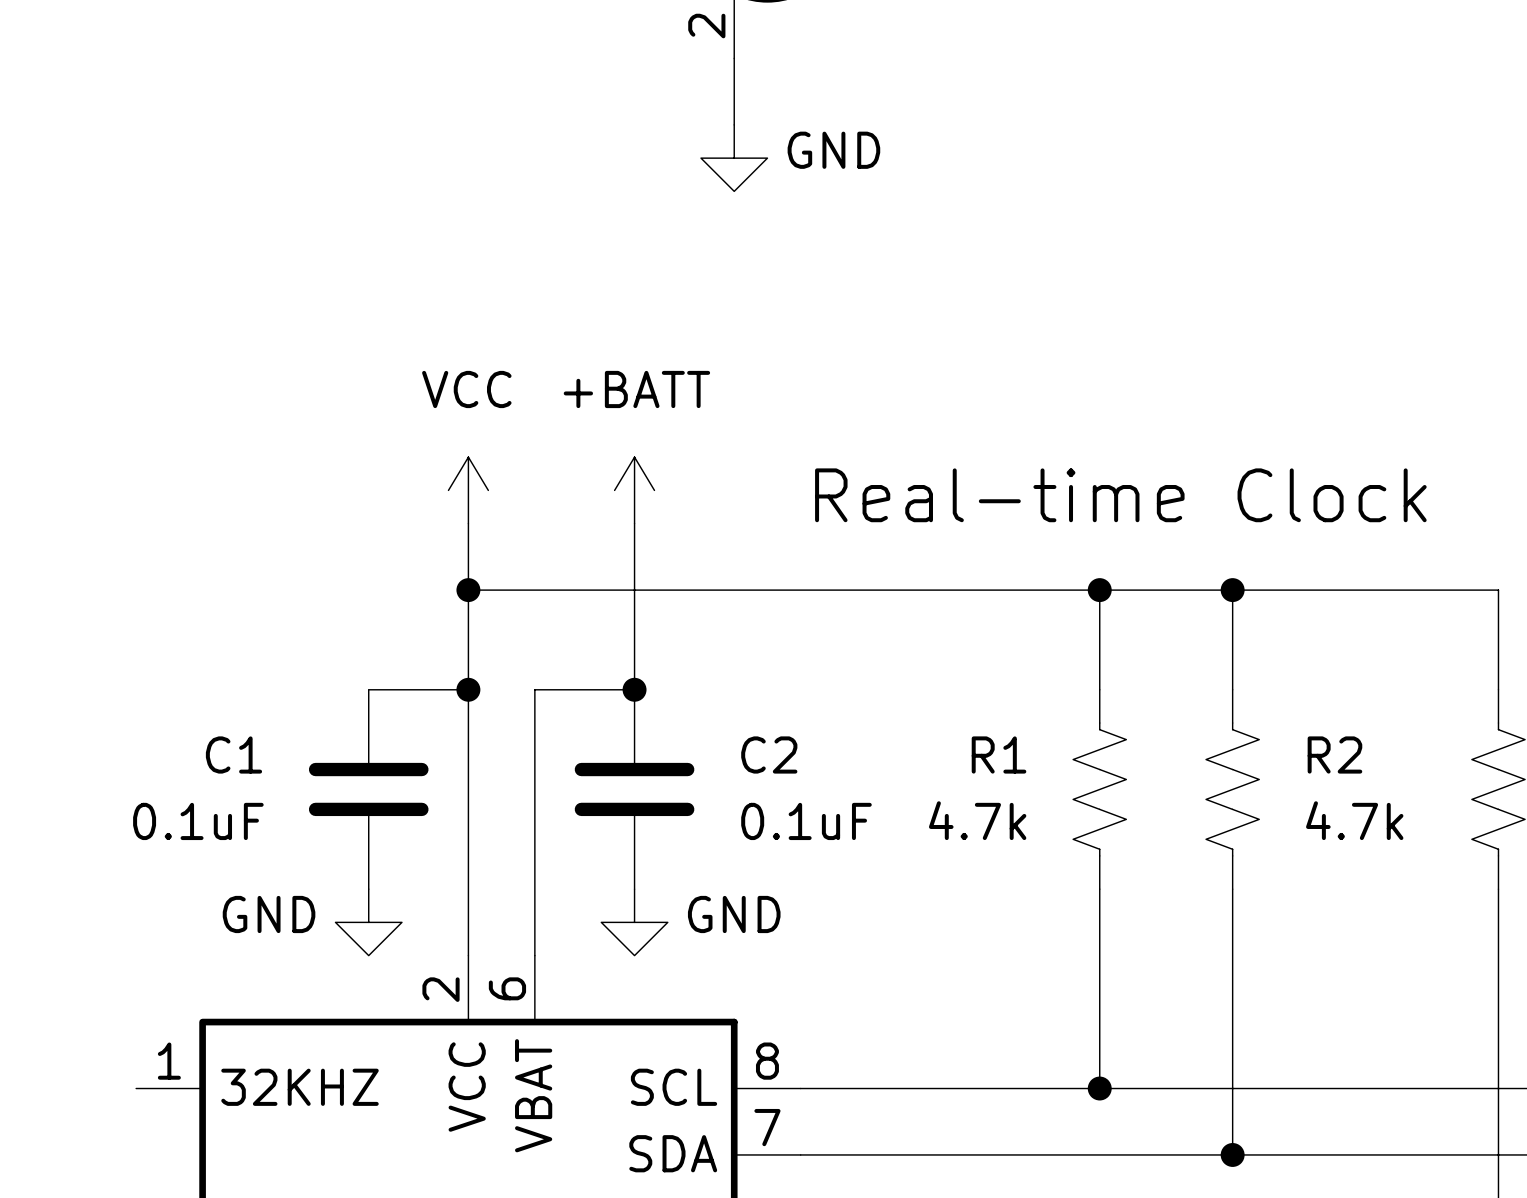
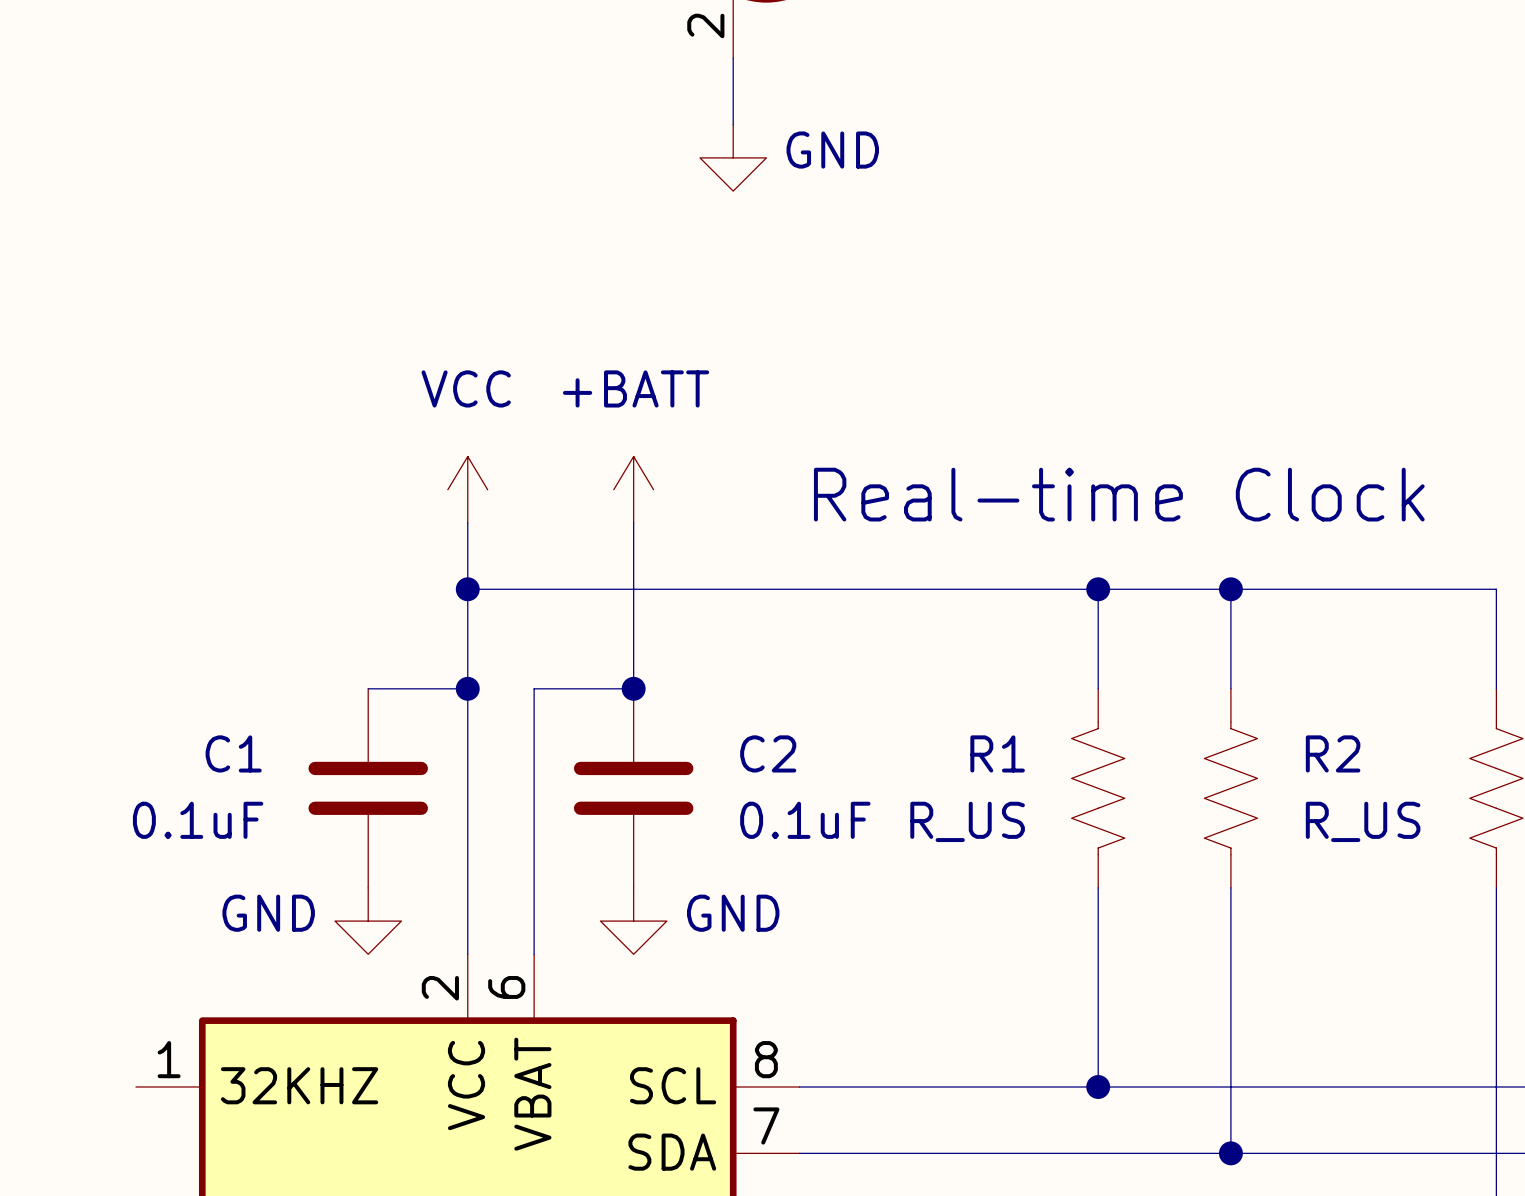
R1 flip: as is (1099, 789) -> left-right (1098, 788)
R1 value: 4.7k (977, 820) -> R_US (967, 821)
R2 value: 4.7k (1354, 820) -> R_US (1363, 821)

